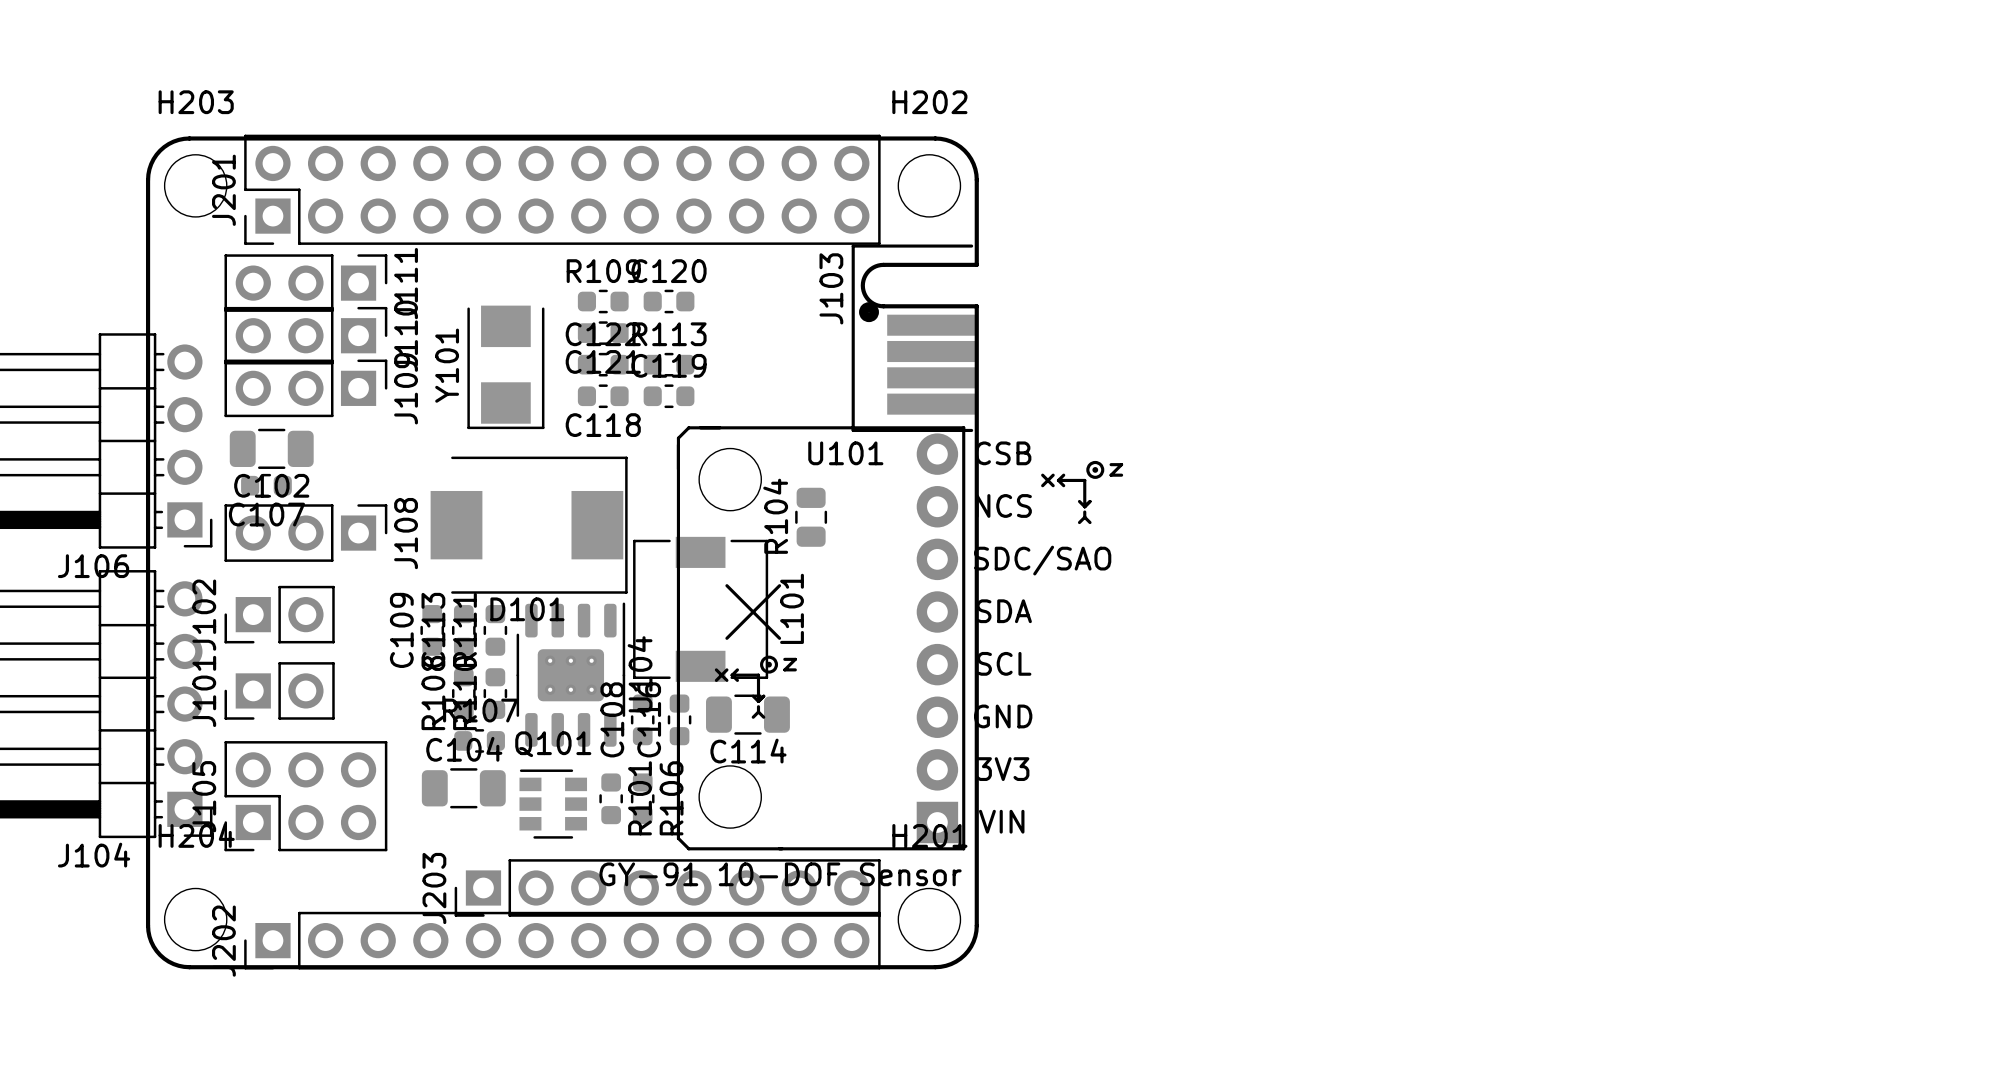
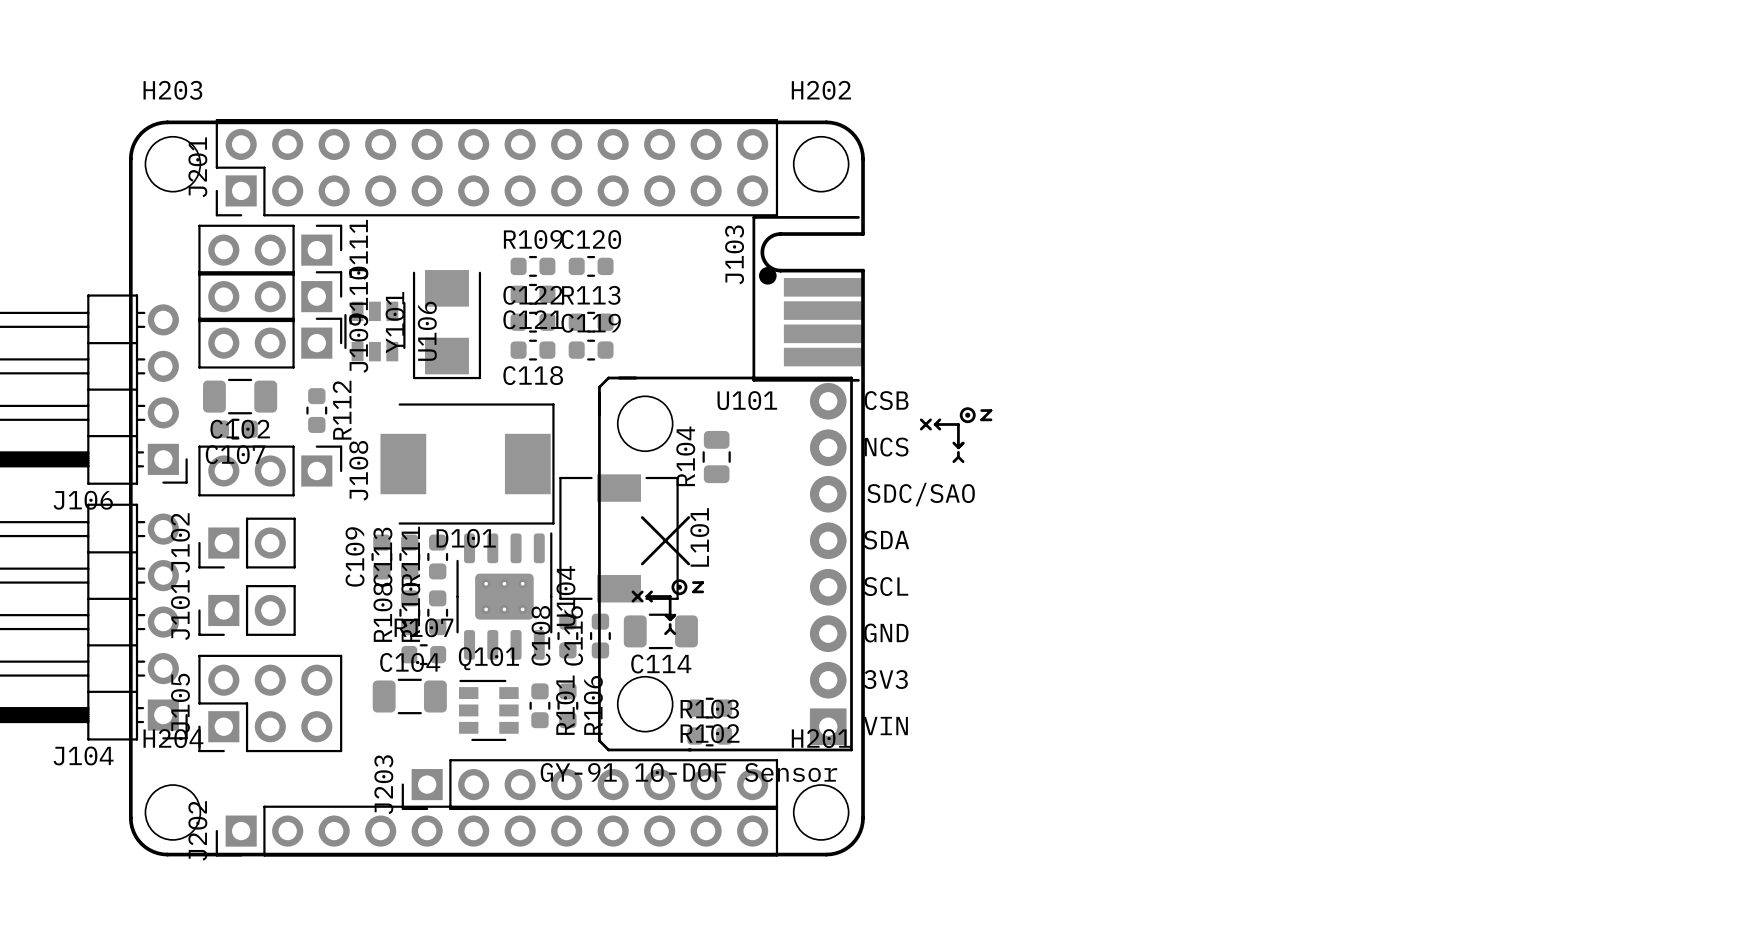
U106: none -> (374, 331)
R112: none -> (316, 410)
R102: none -> (709, 708)
R103: none -> (709, 736)

